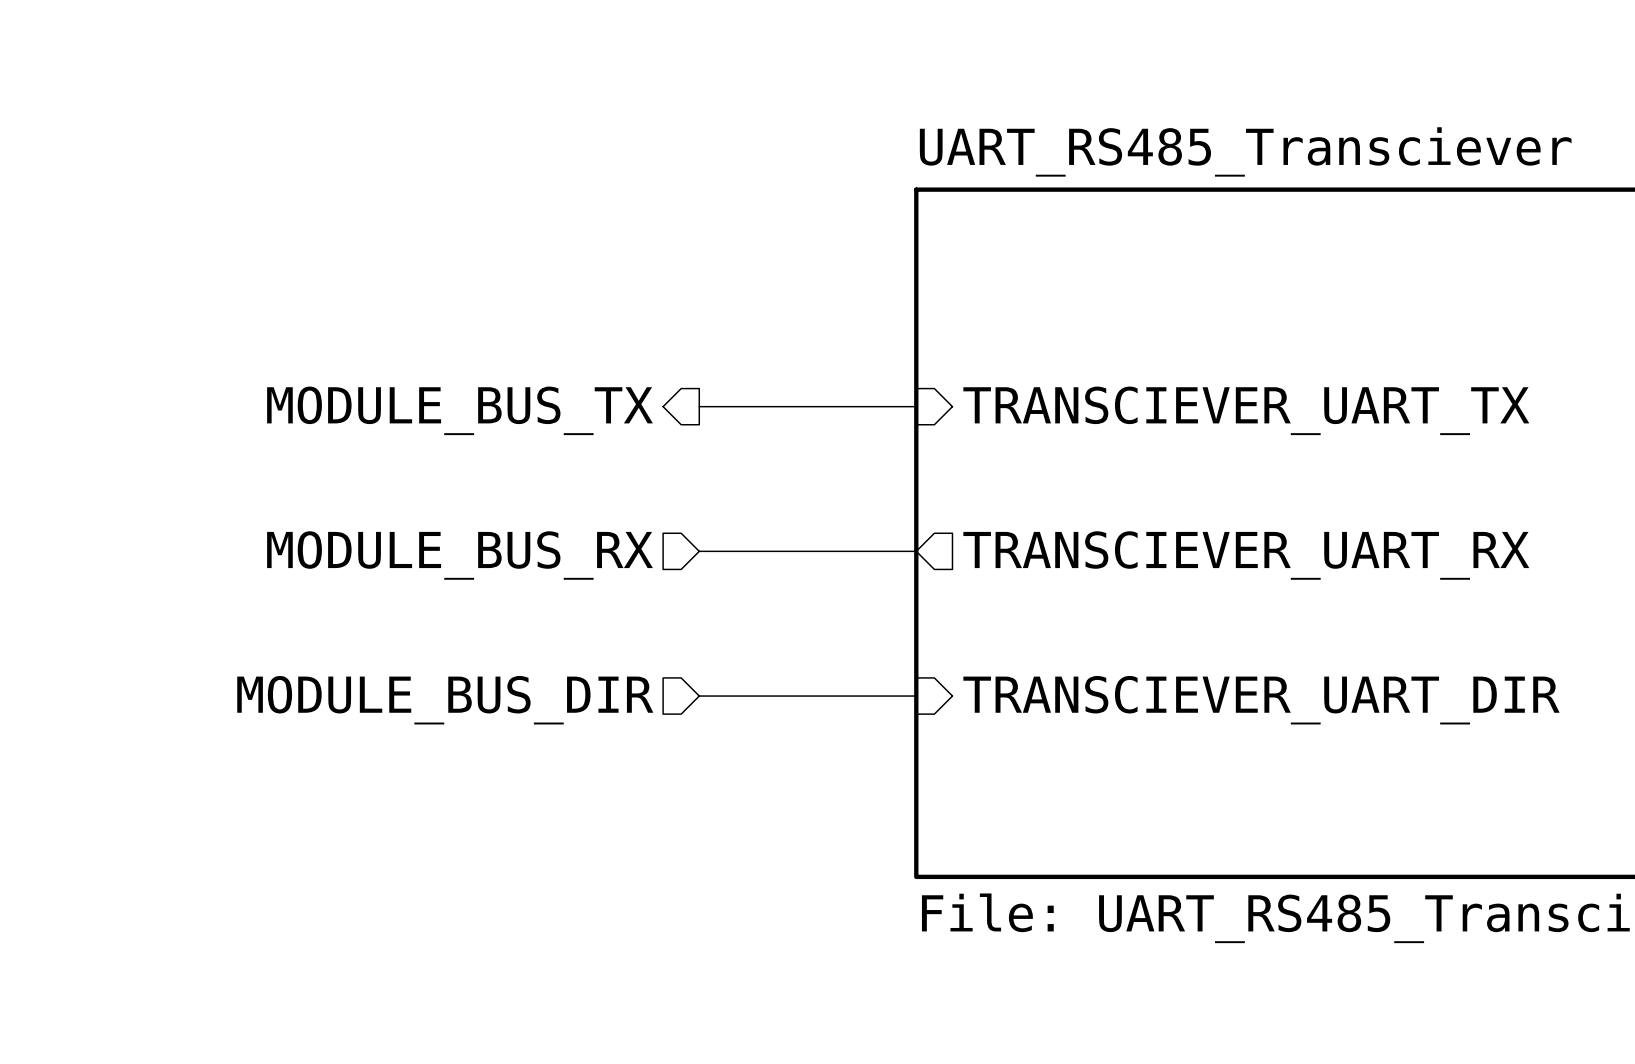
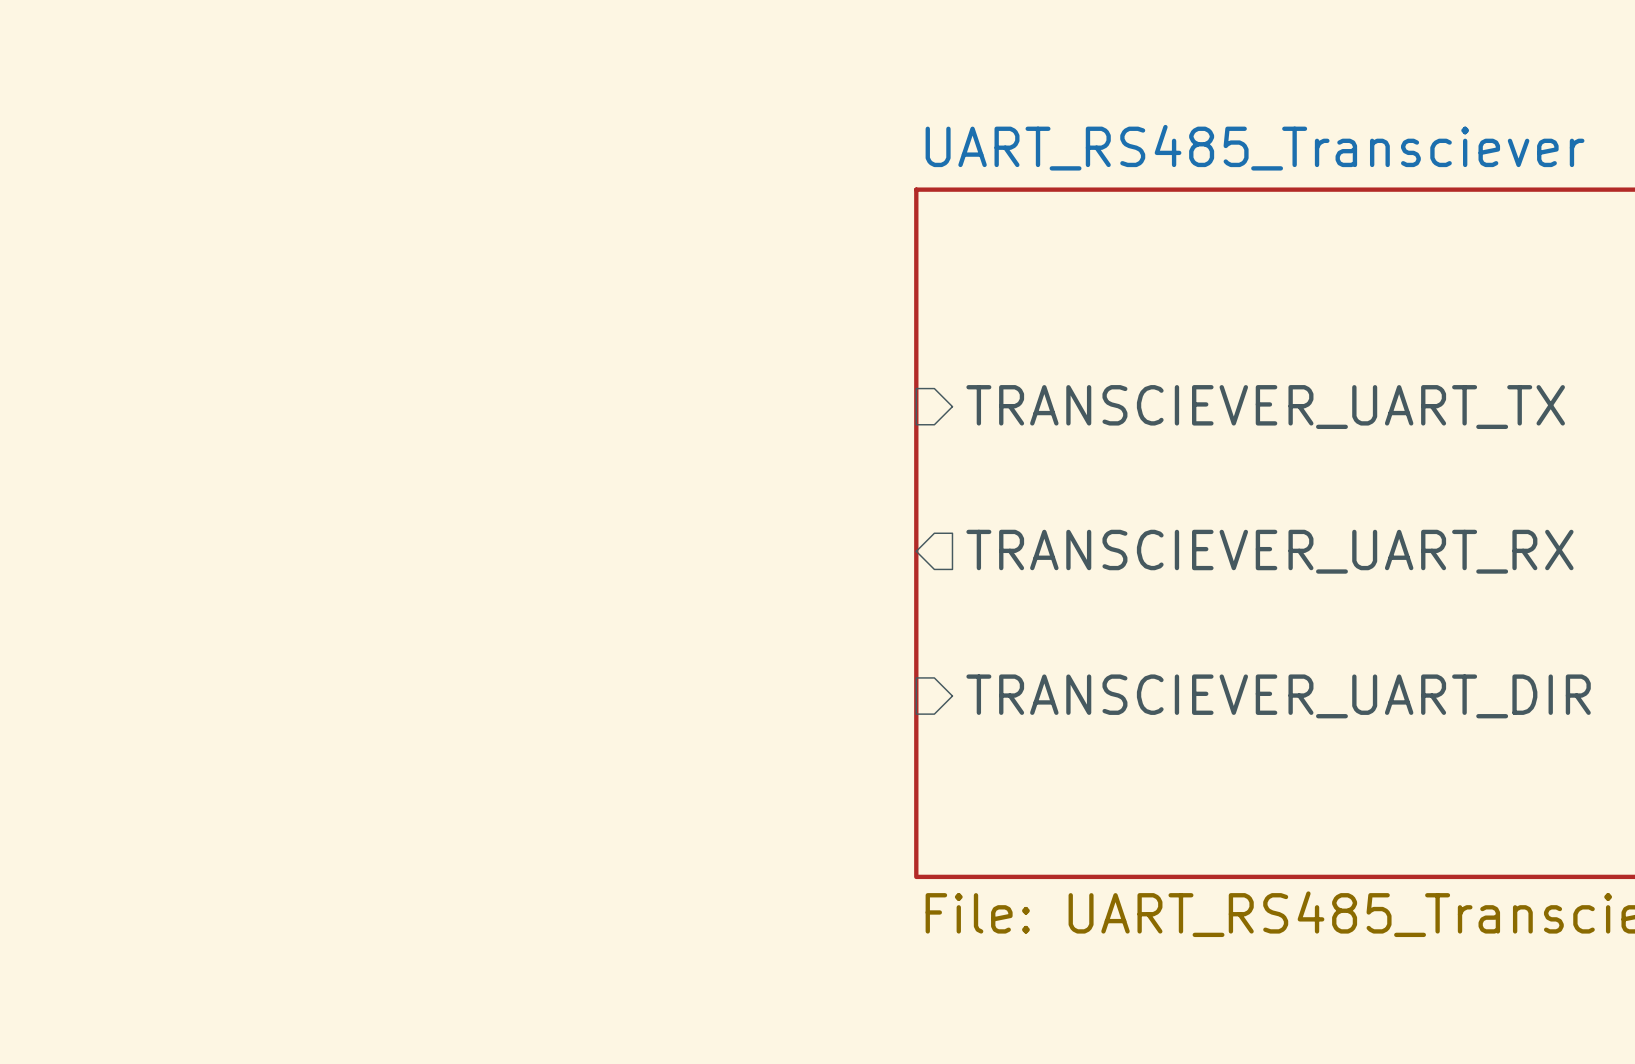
wire: (699, 406) (916, 406) -> none
hierarchical label: MODULE_BUS_TX (460, 410) -> none
wire: (699, 551) (916, 551) -> none
hierarchical label: MODULE_BUS_RX (460, 555) -> none
wire: (699, 696) (916, 696) -> none
hierarchical label: MODULE_BUS_DIR (445, 700) -> none

